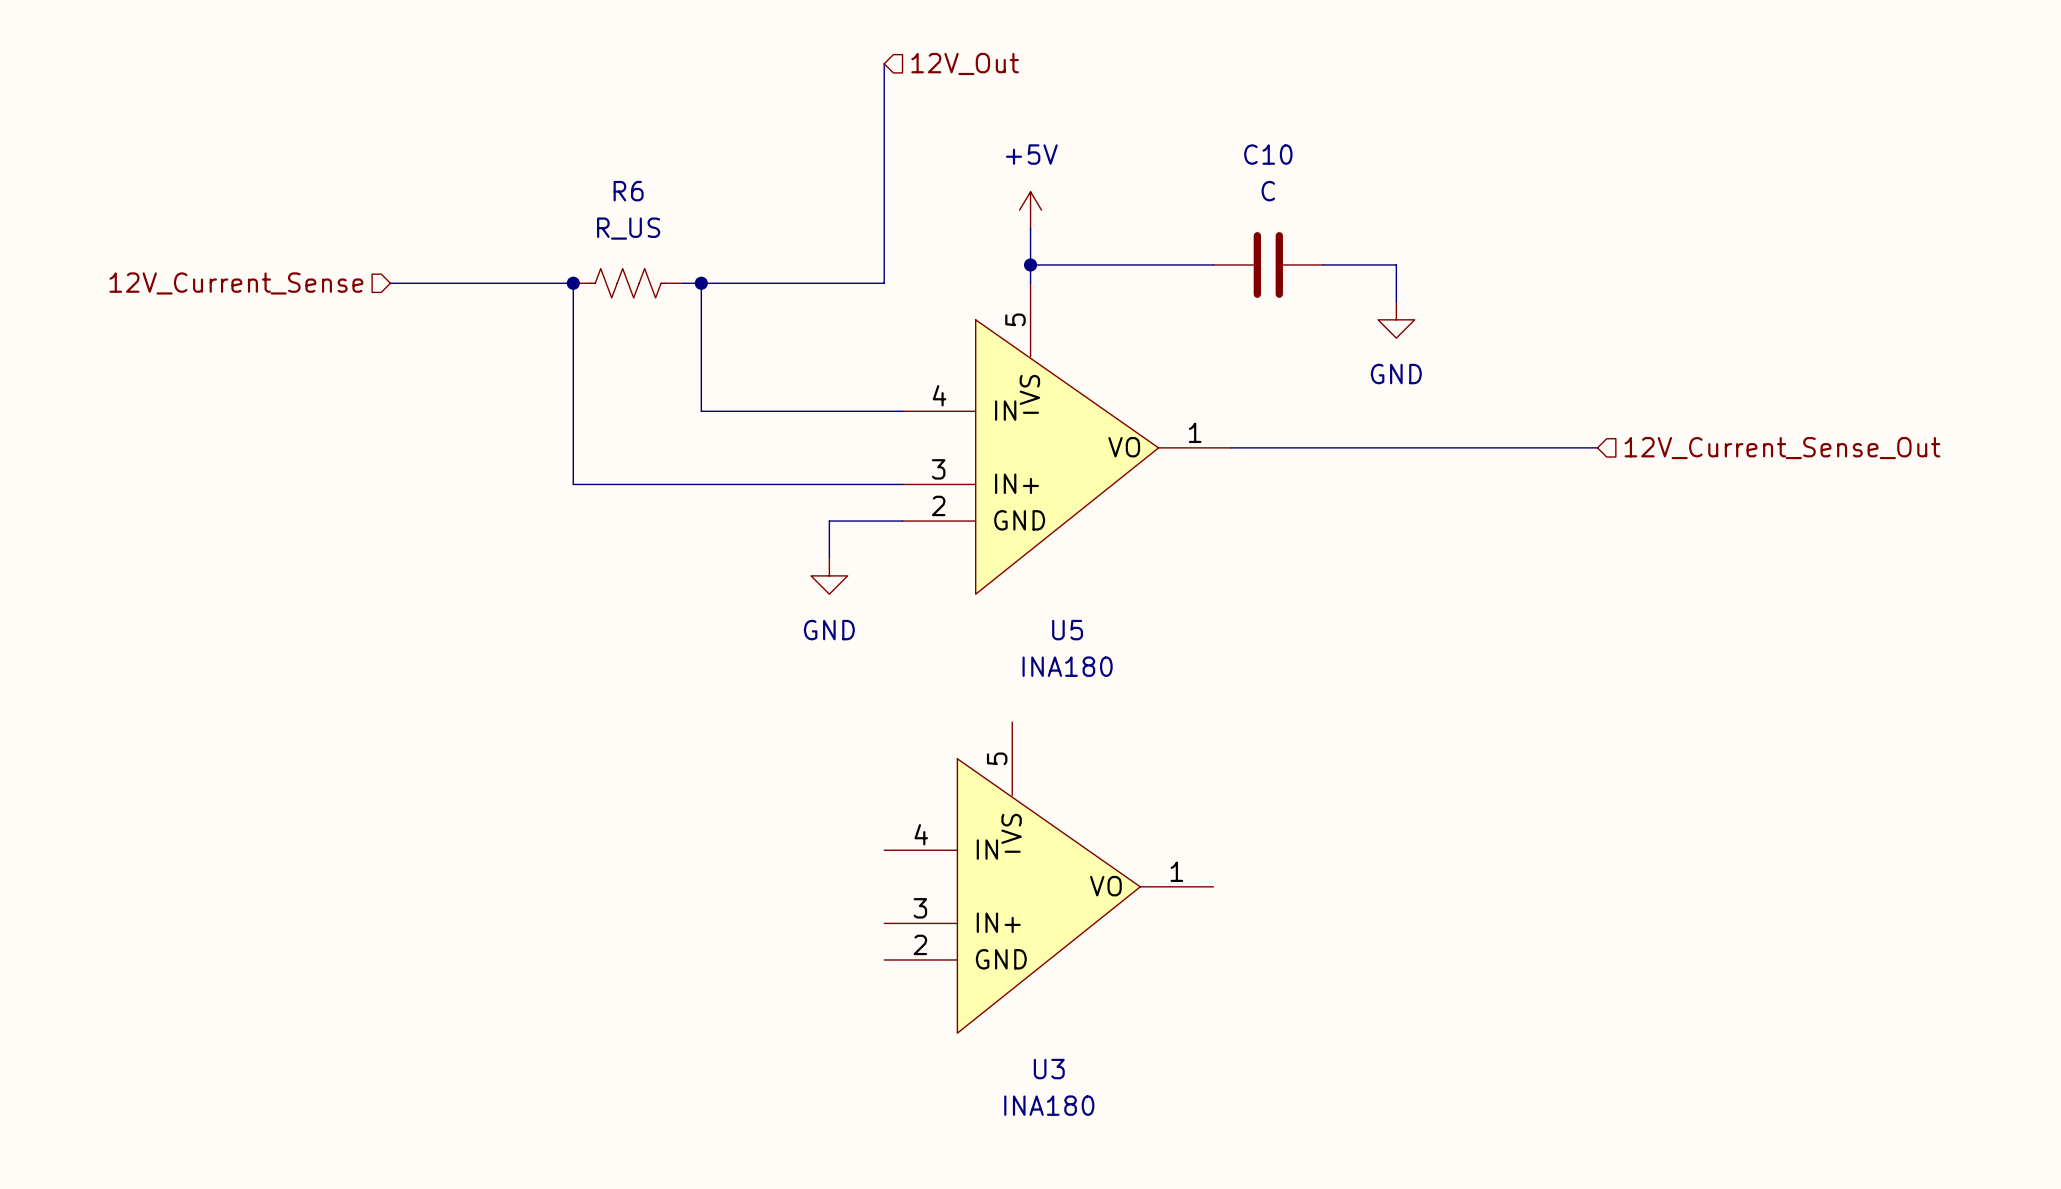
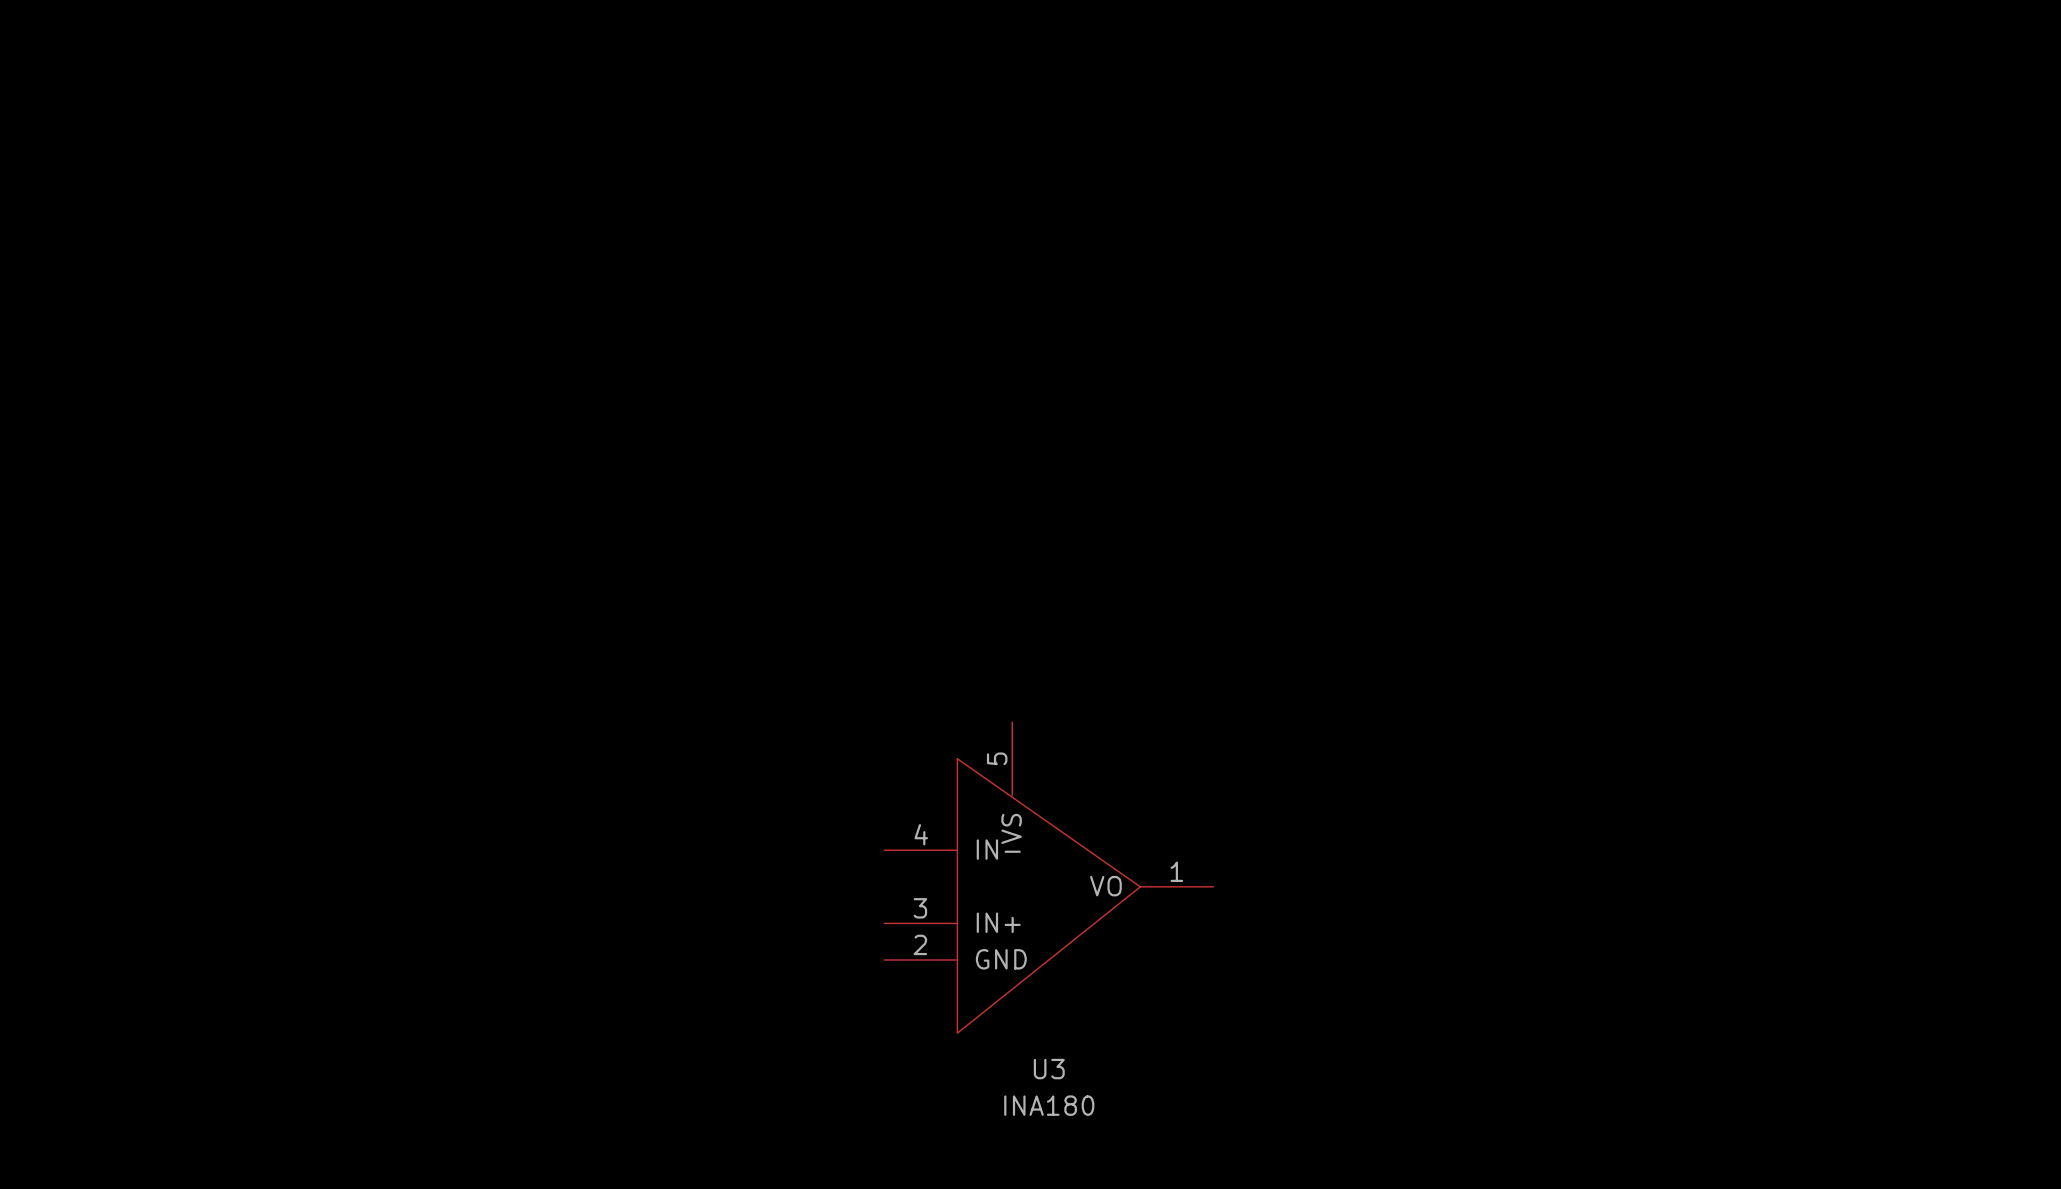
wire: (884, 63) (884, 283) (683, 283) -> none
hierarchical label: 12V_Out (965, 63) -> none
power symbol: +5V (1030, 210) -> none
wire: (1030, 228) (1030, 283) -> none
wire: (1030, 264) (1213, 264) -> none
junction: (1030, 264) -> none
C10: C (1268, 264) -> none
wire: (1323, 264) (1396, 264) (1396, 301) -> none
hierarchical label: 12V_Current_Sense (236, 283) -> none
wire: (390, 283) (573, 283) (573, 484) (902, 484) -> none
junction: (573, 283) -> none
R6: R_US (628, 283) -> none
wire: (701, 283) (701, 411) (902, 411) -> none
junction: (701, 283) -> none
power symbol: GND (1396, 319) -> none
U5: INA180 (1067, 438) -> none
wire: (1231, 447) (1597, 447) -> none
hierarchical label: 12V_Current_Sense_Out (1782, 448) -> none
wire: (902, 521) (829, 521) (829, 557) -> none
power symbol: GND (829, 575) -> none

